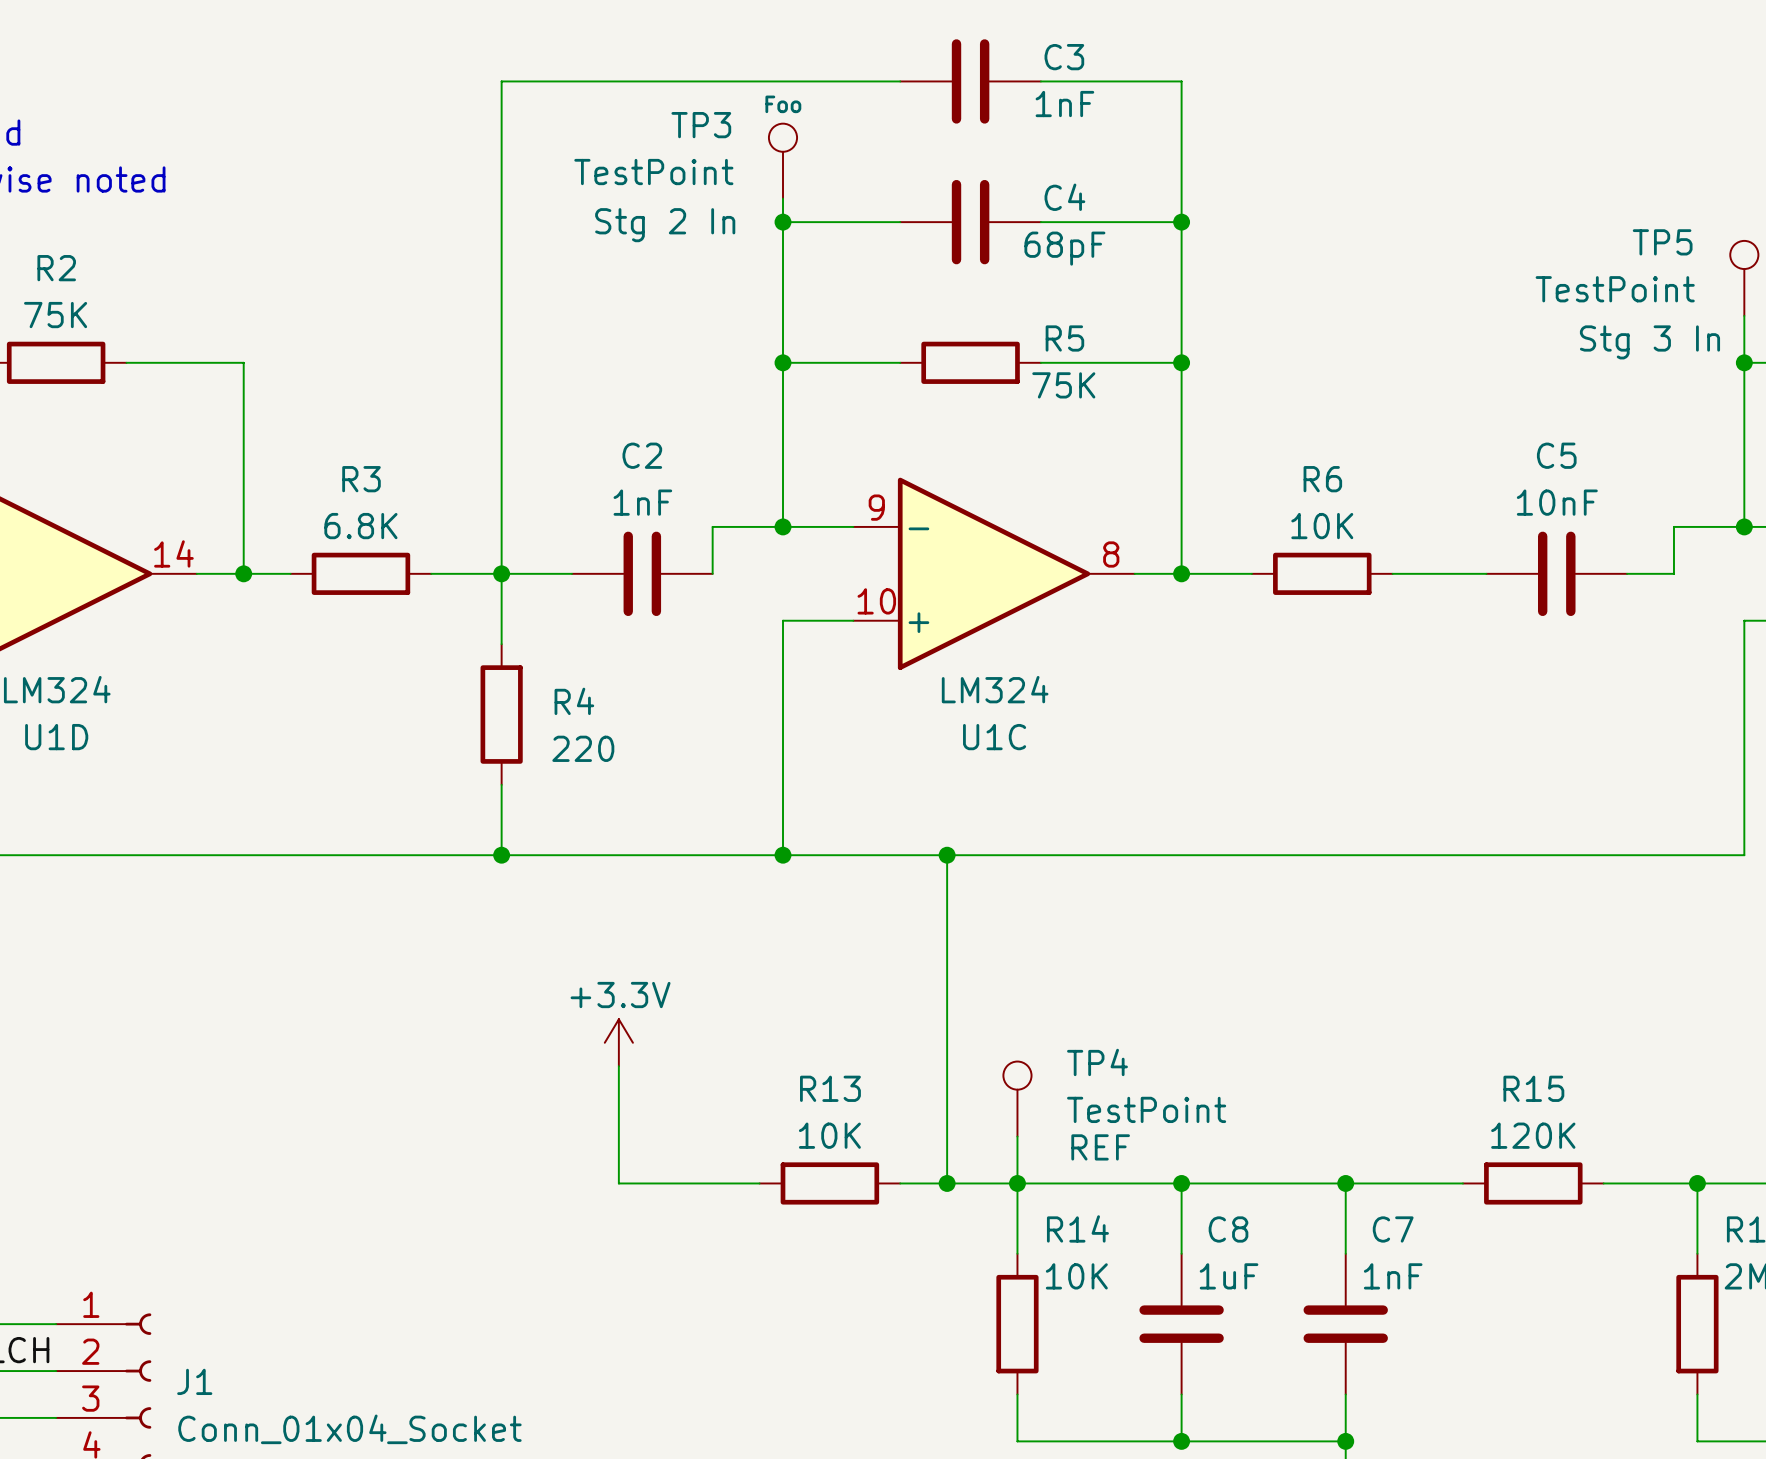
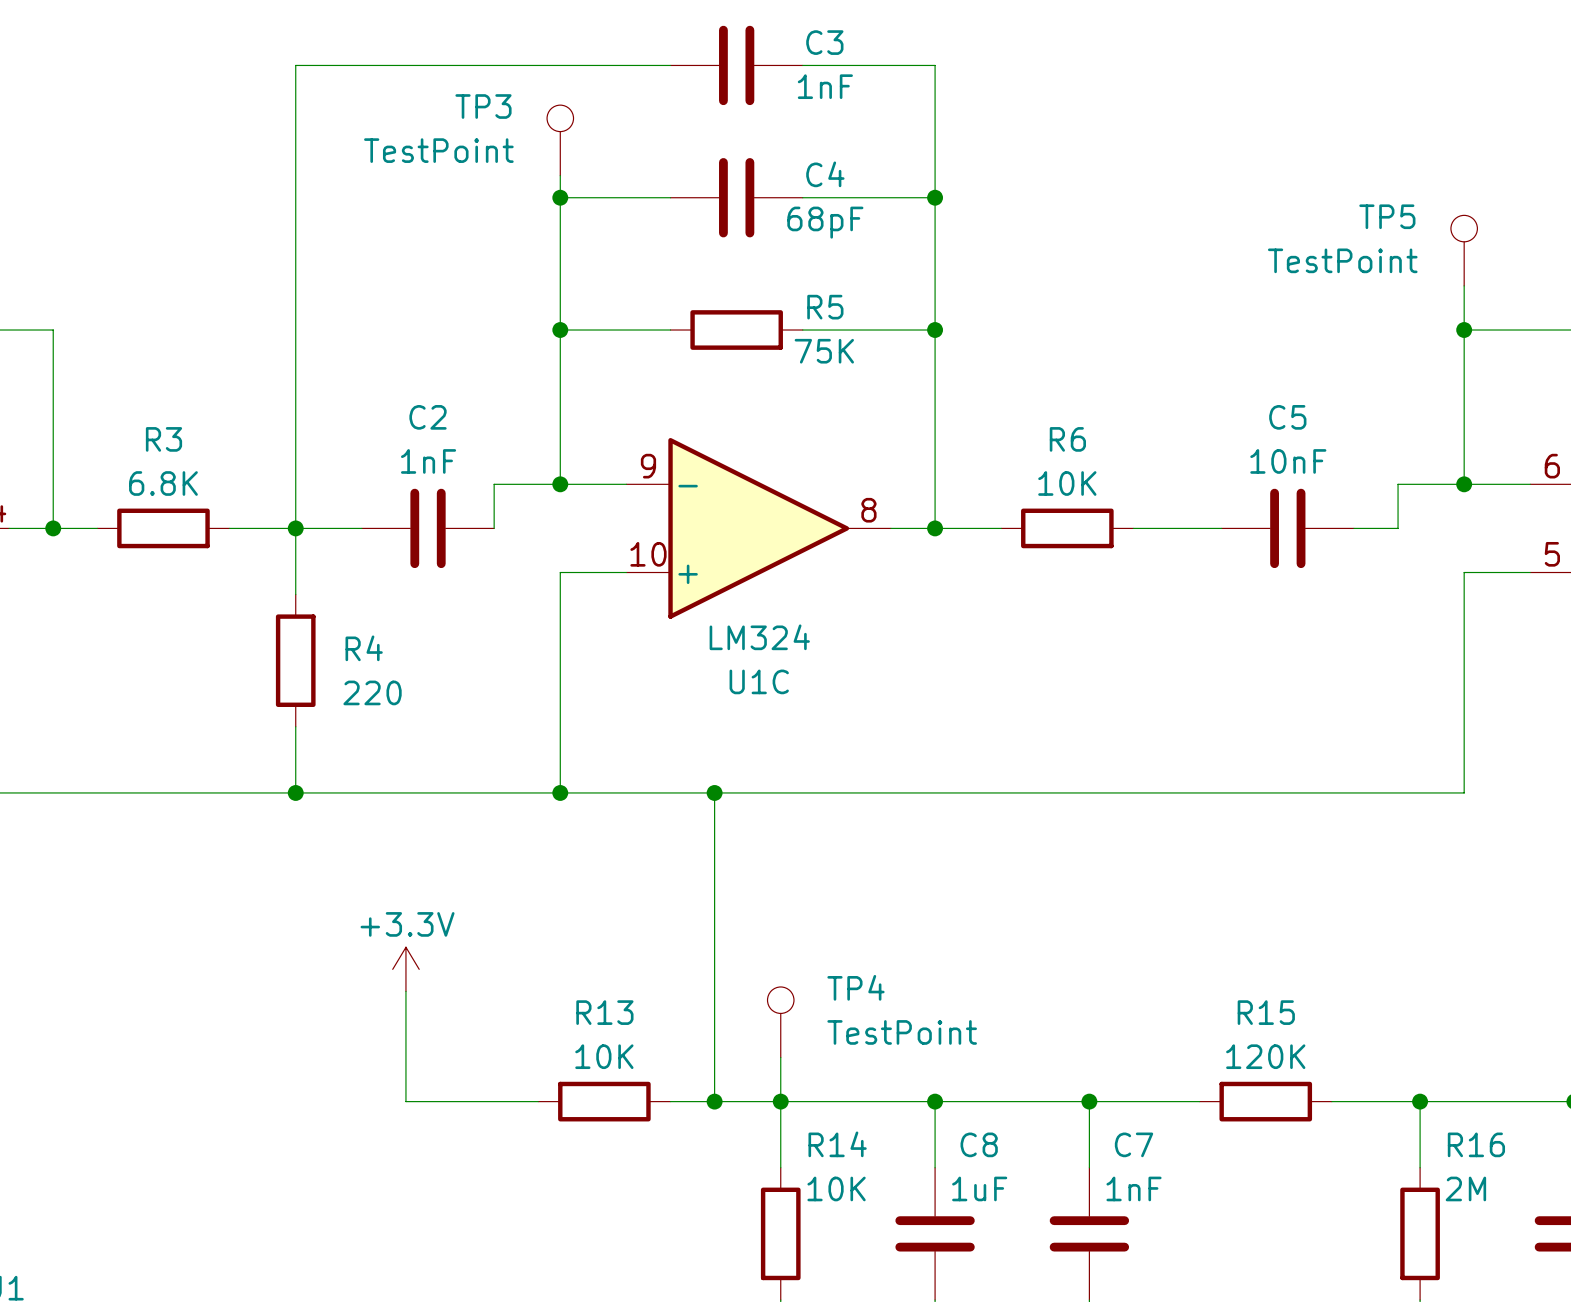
TP3 text: Foo (783, 104) -> none
TP3 text: Stg 2 In (665, 225) -> none
TP5 text: Stg 3 In (1649, 342) -> none
TP4 text: REF (1100, 1147) -> none

